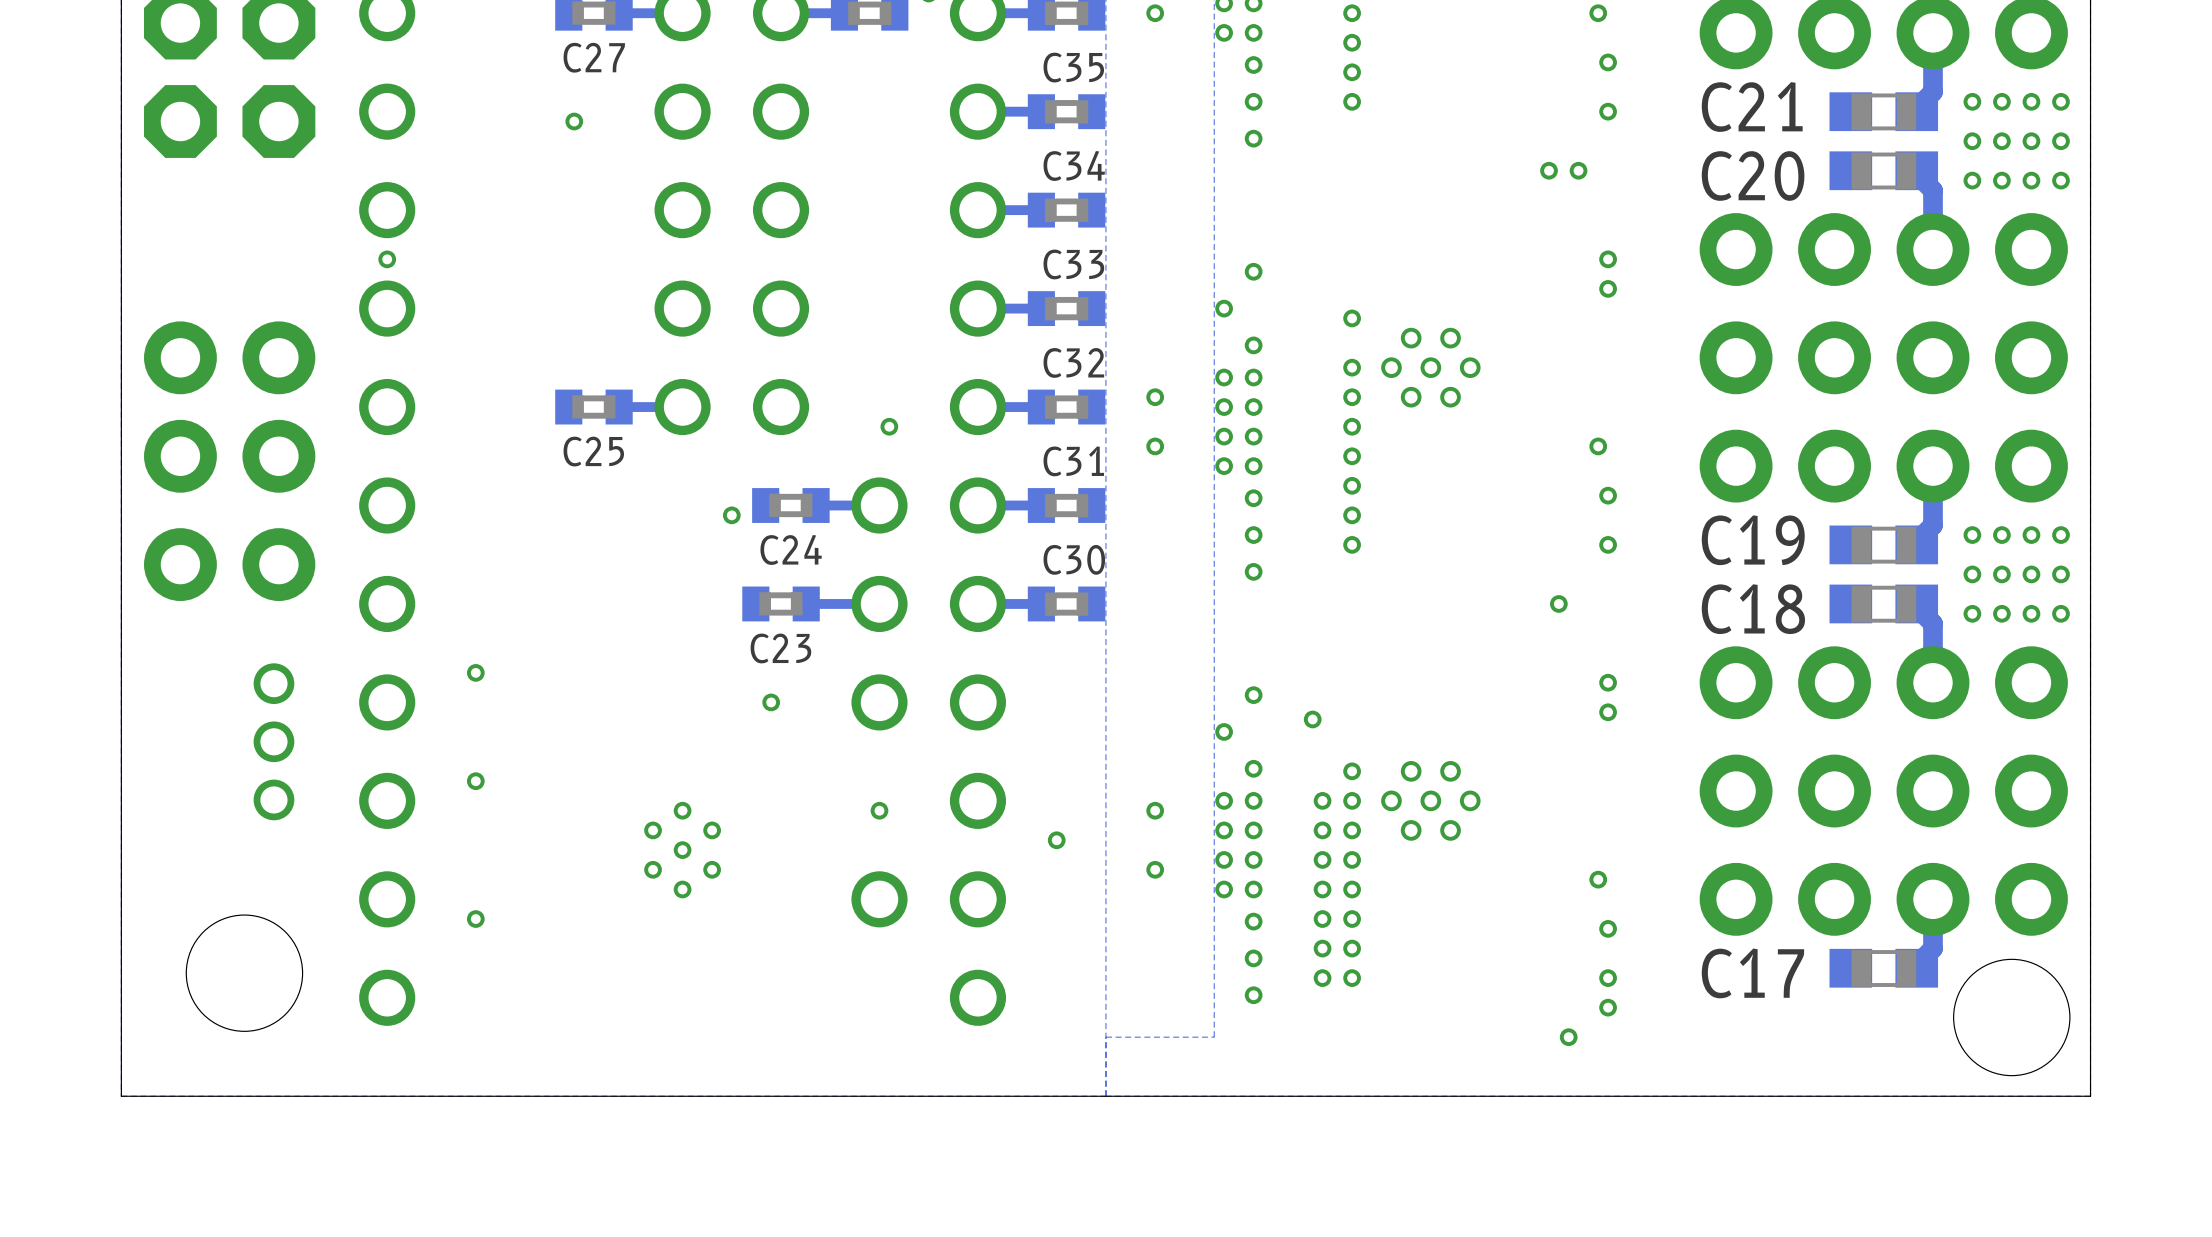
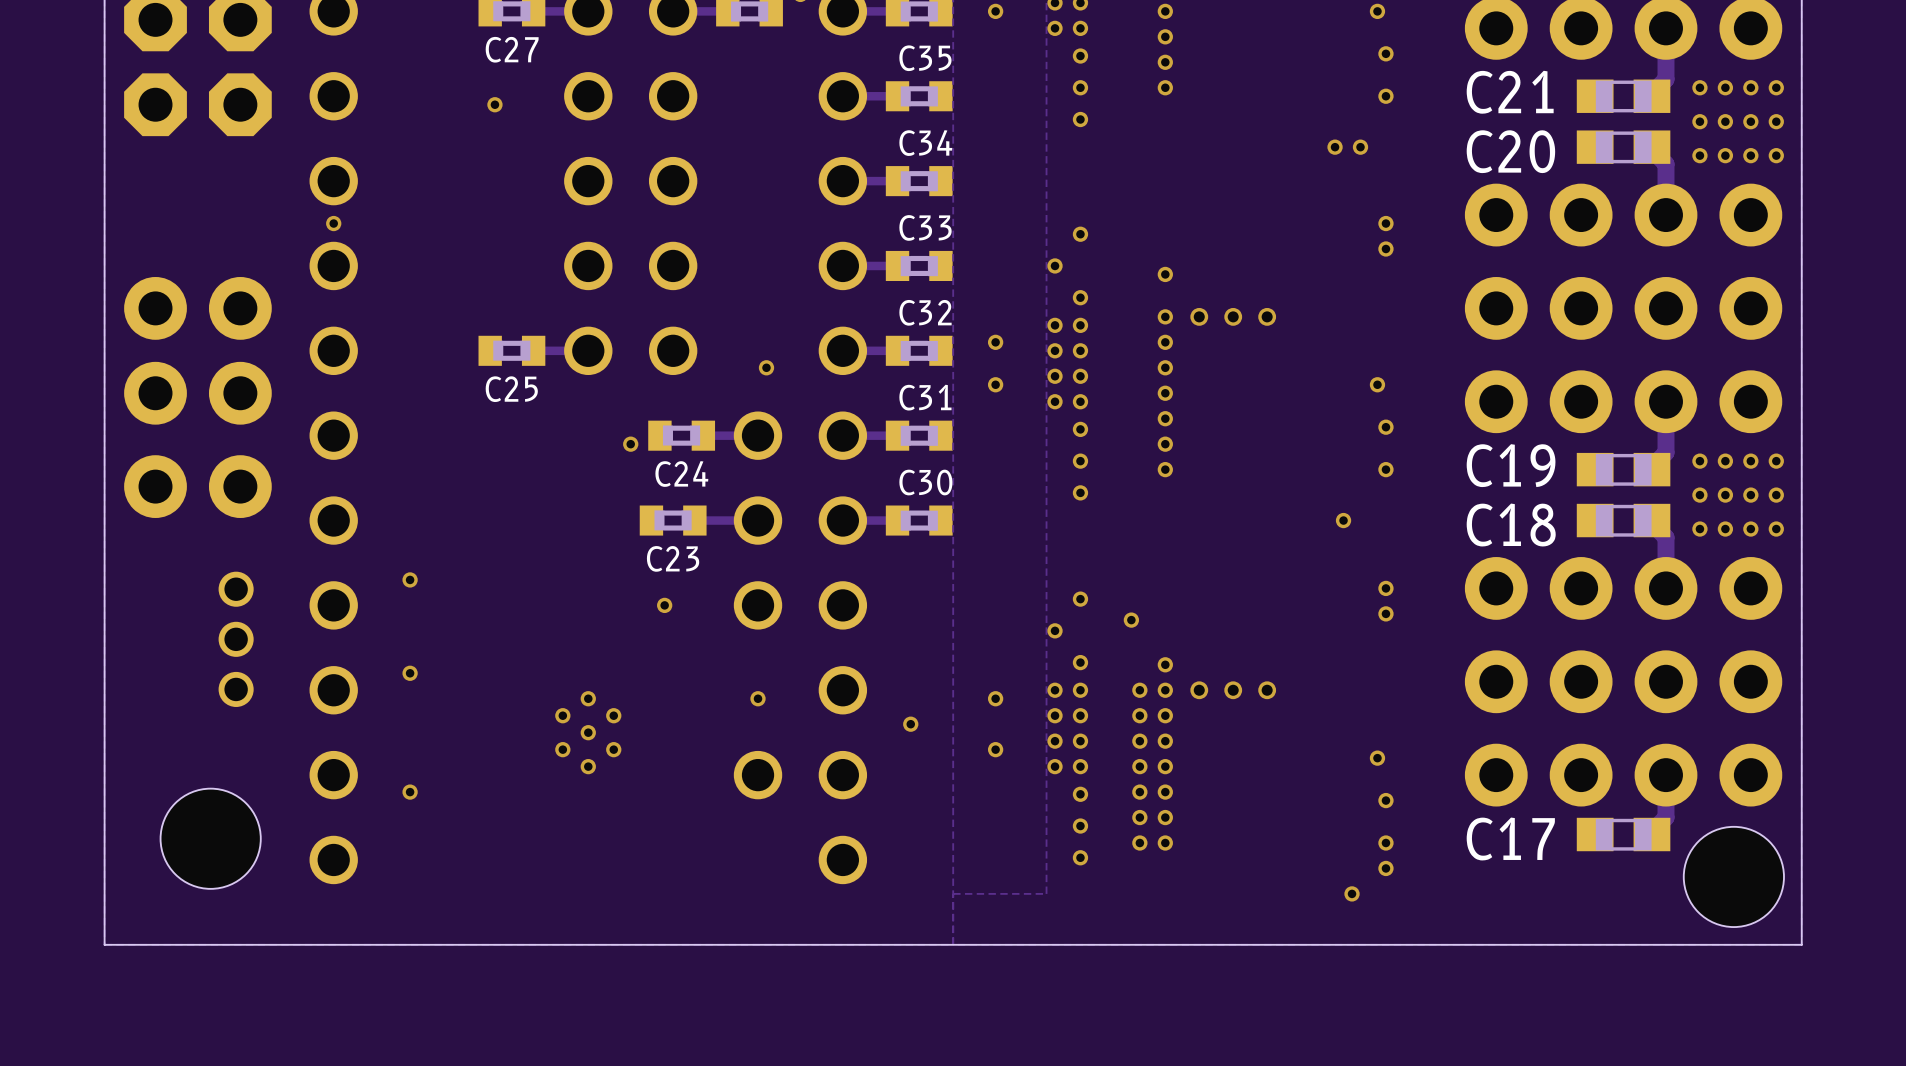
via: (1411, 338) -> none
via: (1450, 338) -> none
via: (1411, 397) -> none
via: (1450, 397) -> none
via: (1411, 771) -> none
via: (1450, 771) -> none
via: (1411, 830) -> none
via: (1450, 830) -> none

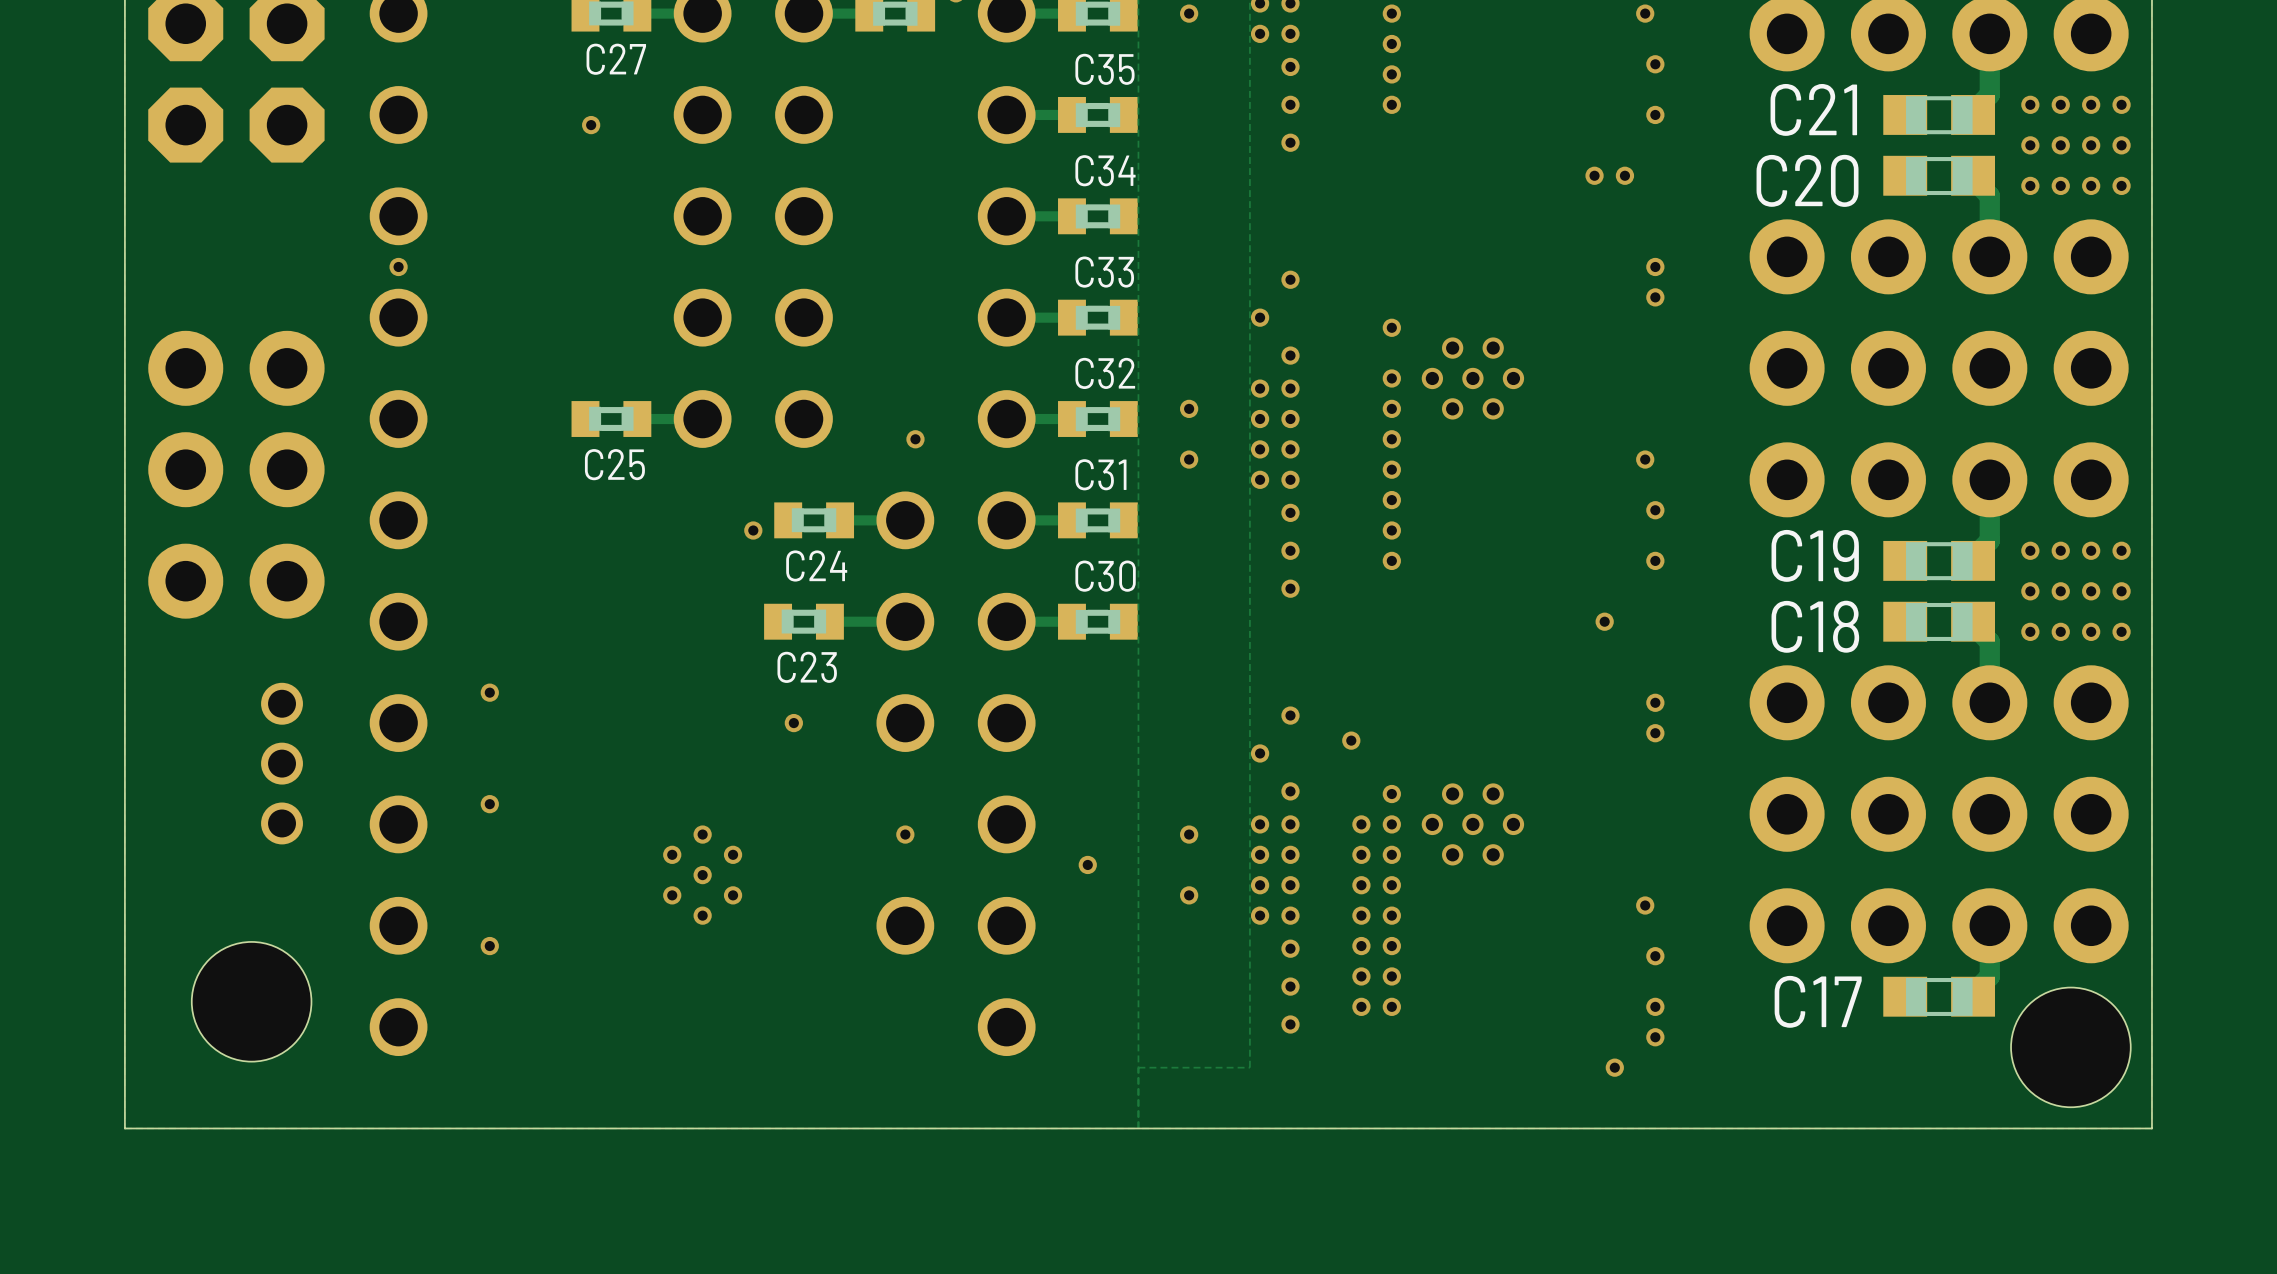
via: none -> (1452, 348)
via: none -> (1493, 348)
via: none -> (1452, 408)
via: none -> (1493, 408)
via: none -> (1452, 794)
via: none -> (1493, 794)
via: none -> (1452, 854)
via: none -> (1493, 854)

